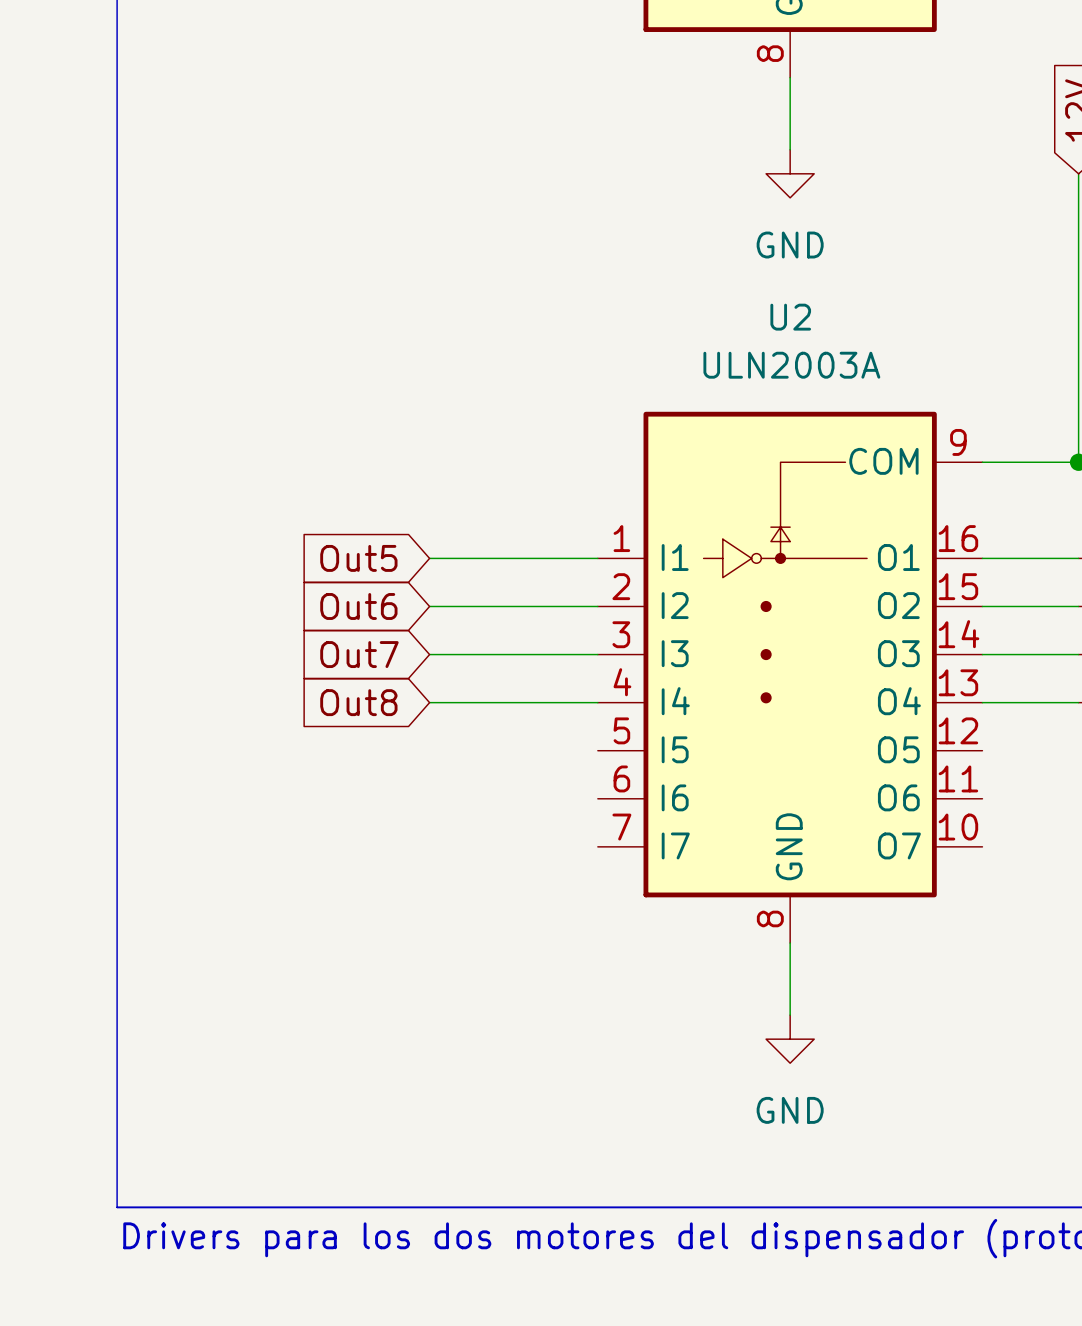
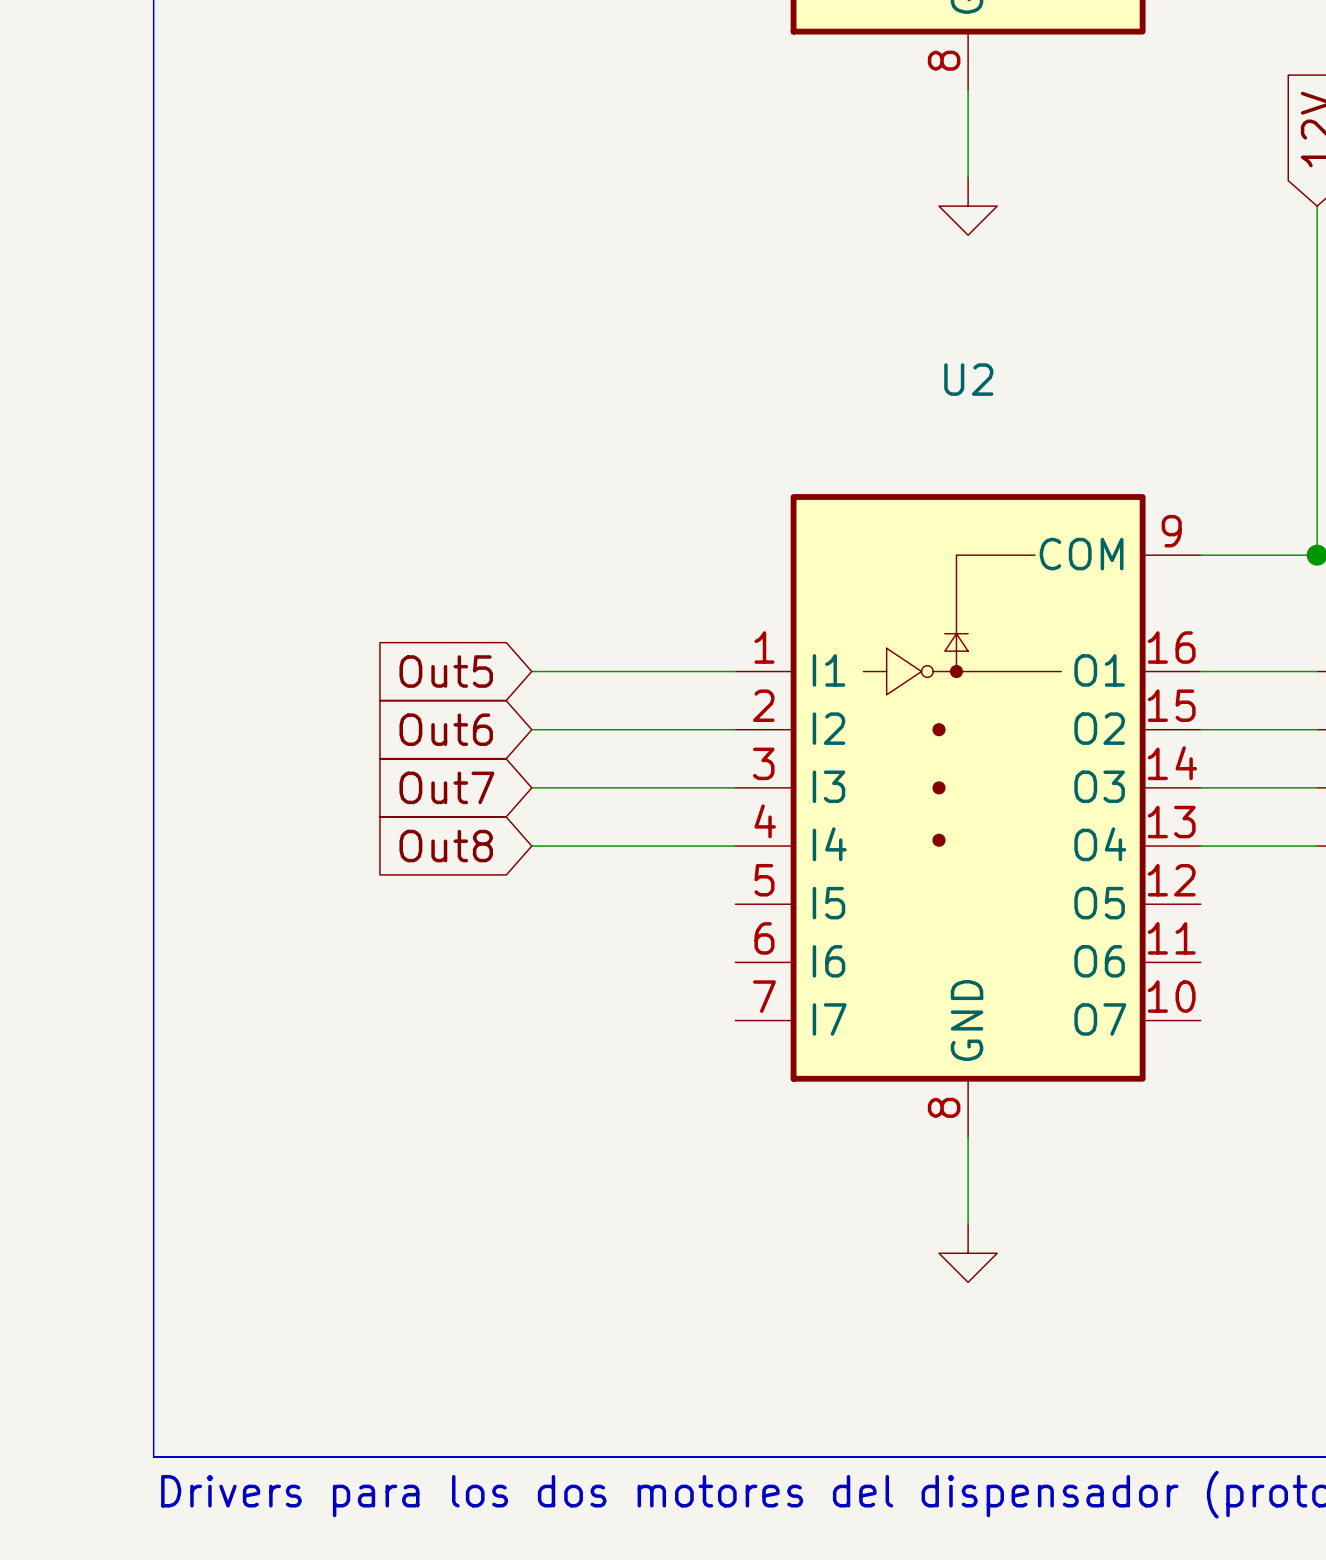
power symbol text: GND (790, 245) -> none
U2 value: ULN2003A (791, 365) -> none
power symbol text: GND (790, 1110) -> none

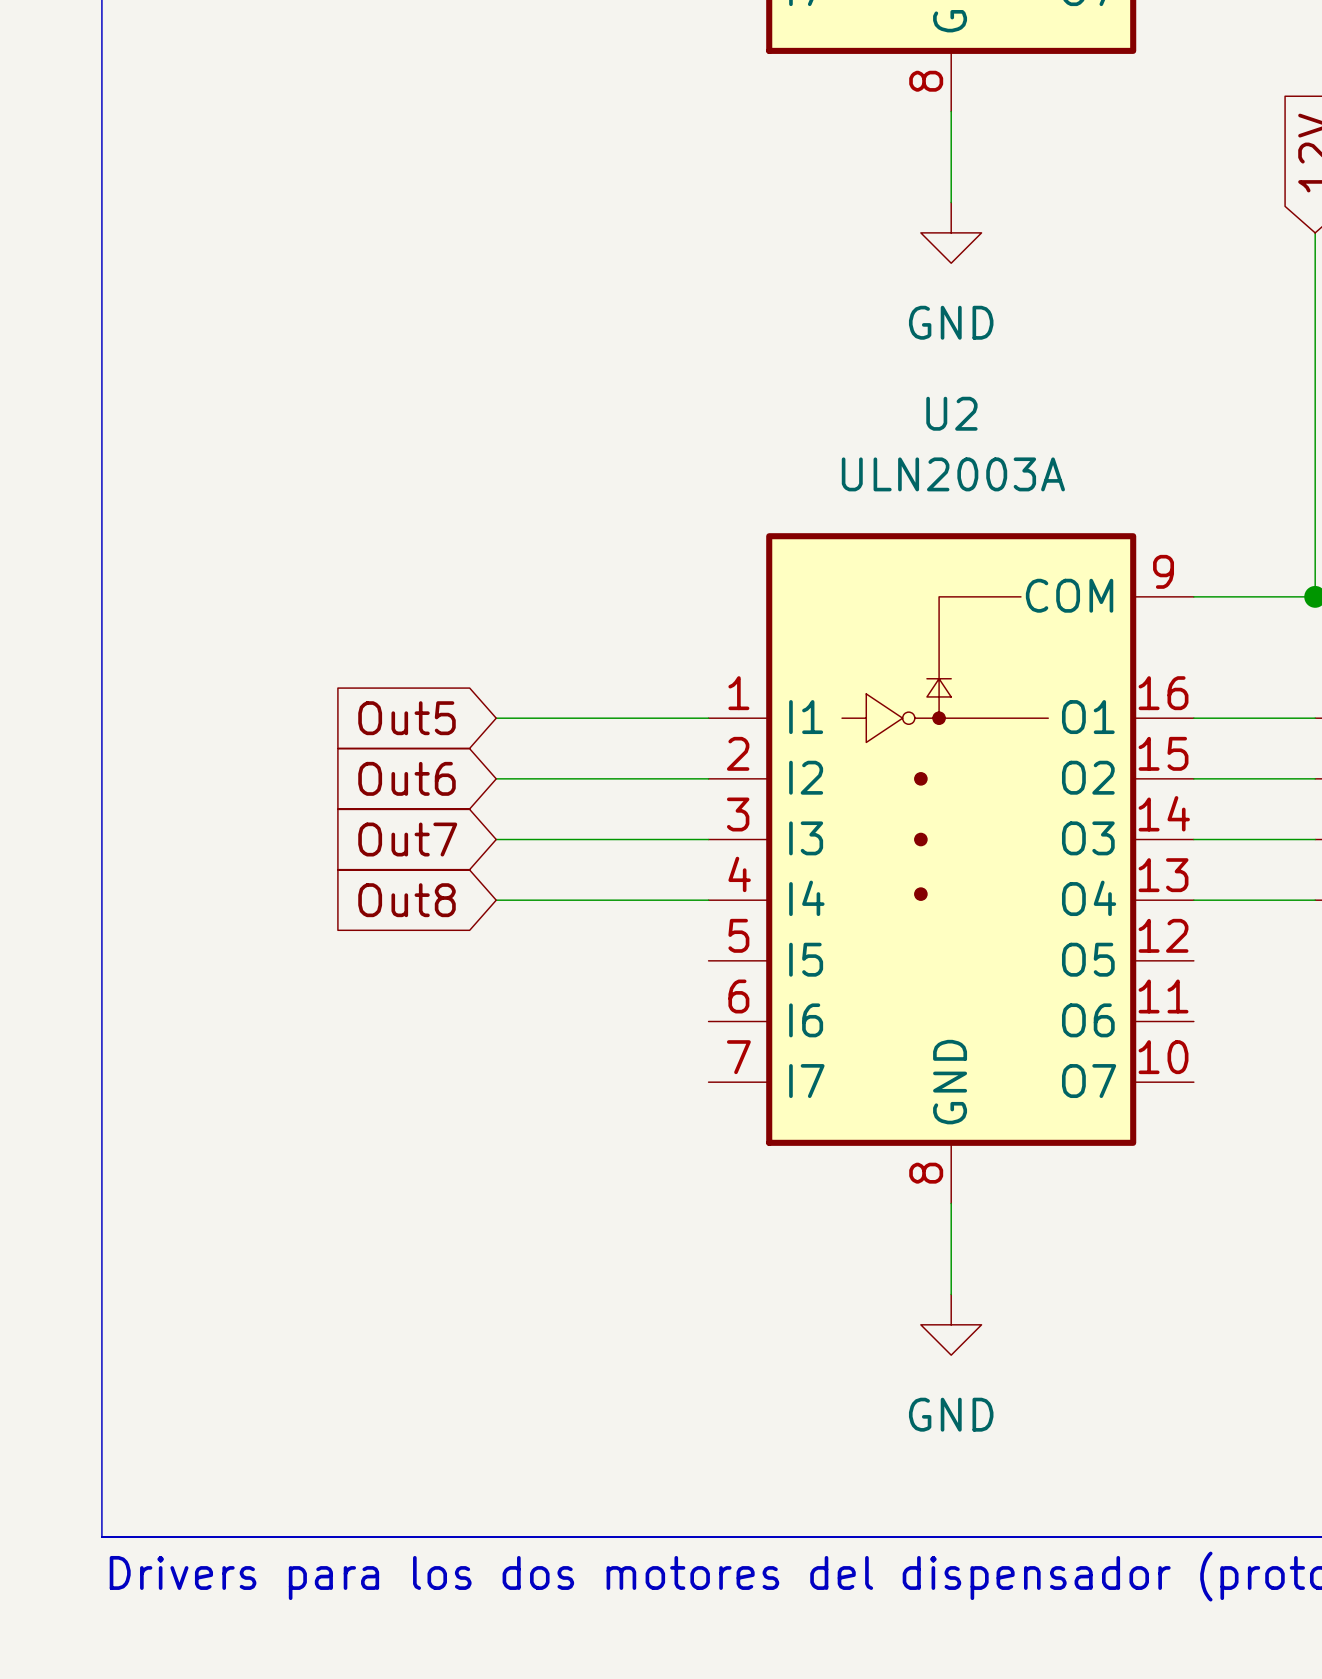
power symbol text: none -> GND (951, 322)
U2 value: none -> ULN2003A (953, 474)
power symbol text: none -> GND (951, 1414)

